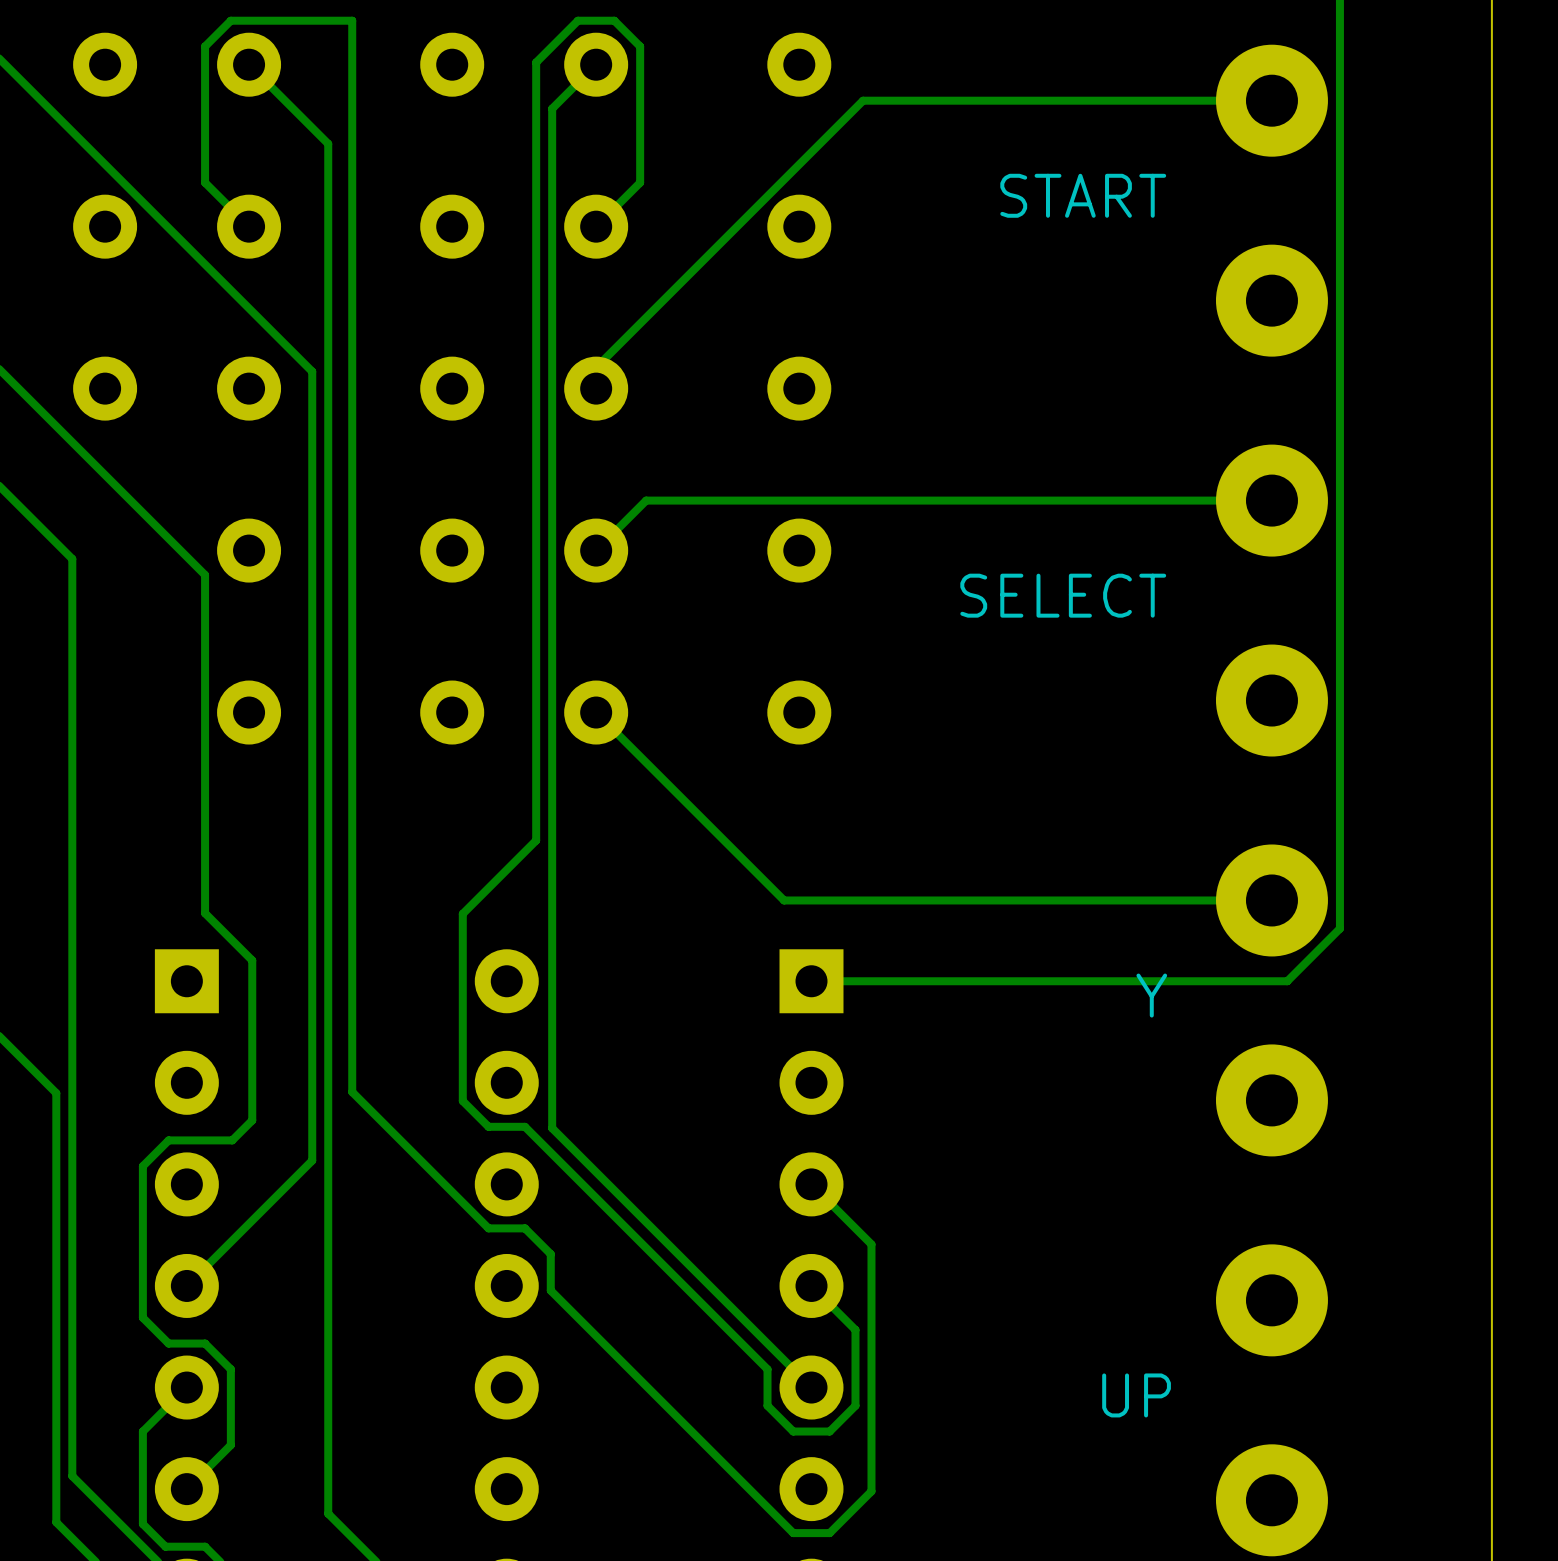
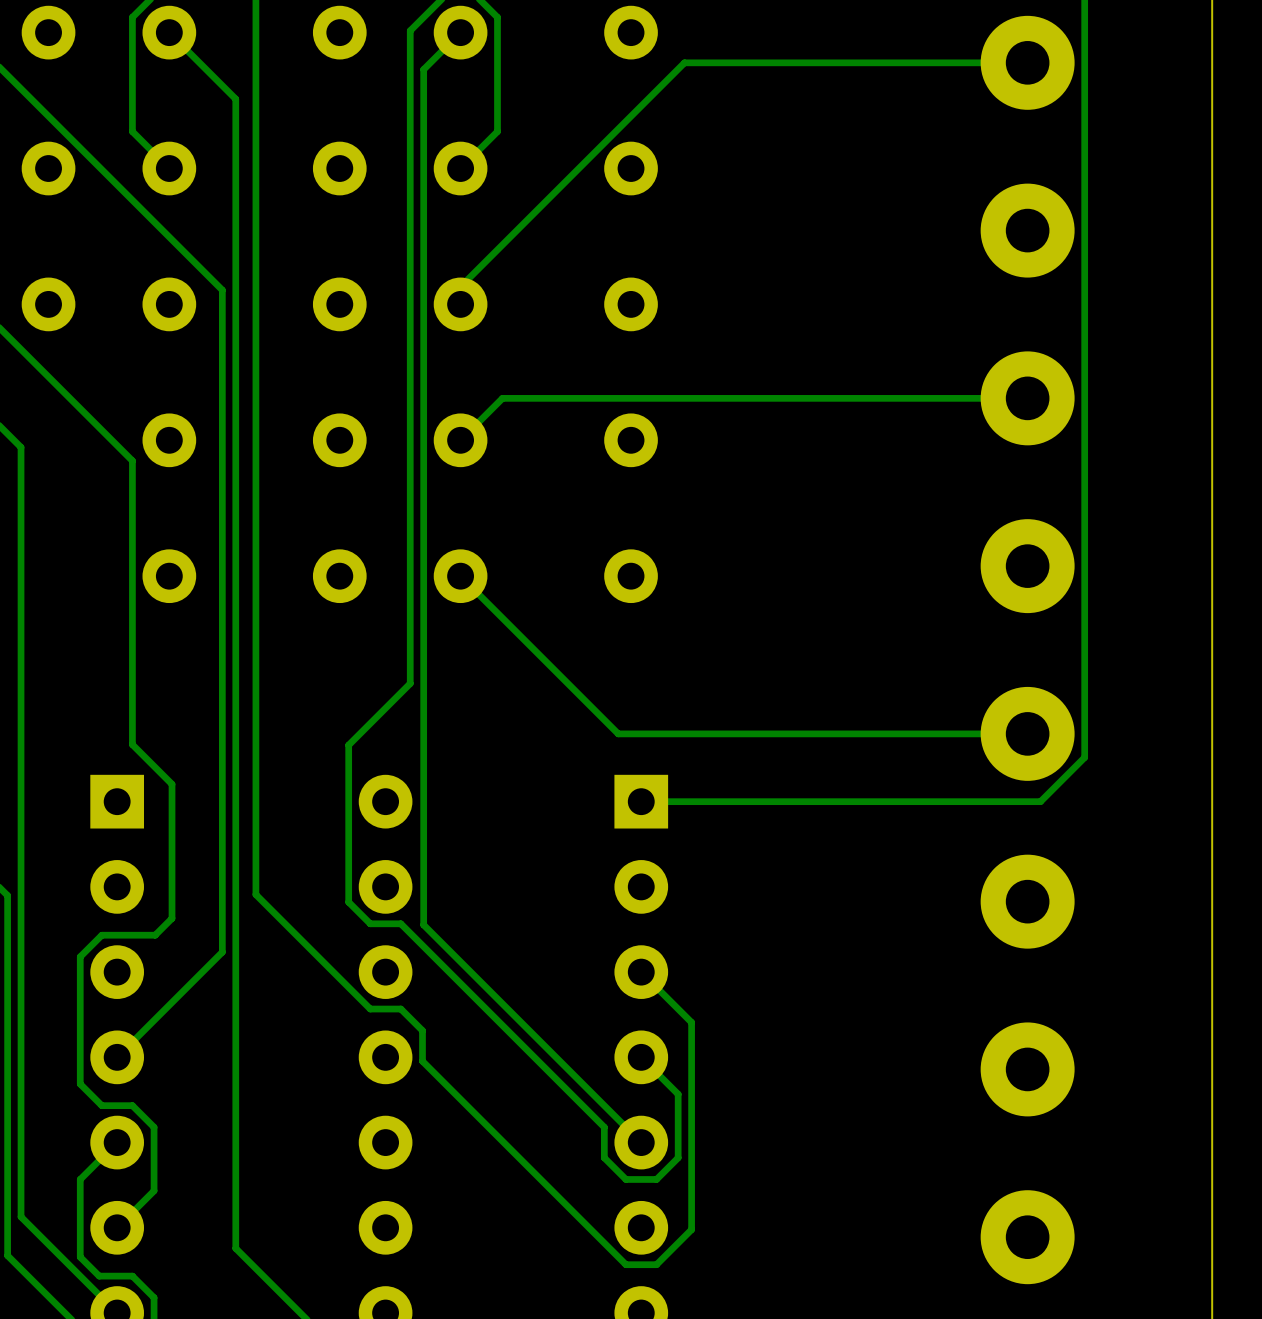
text: START (1083, 195) -> none
text: SELECT (1063, 595) -> none
text: Y (1151, 995) -> none
text: UP (1136, 1395) -> none

